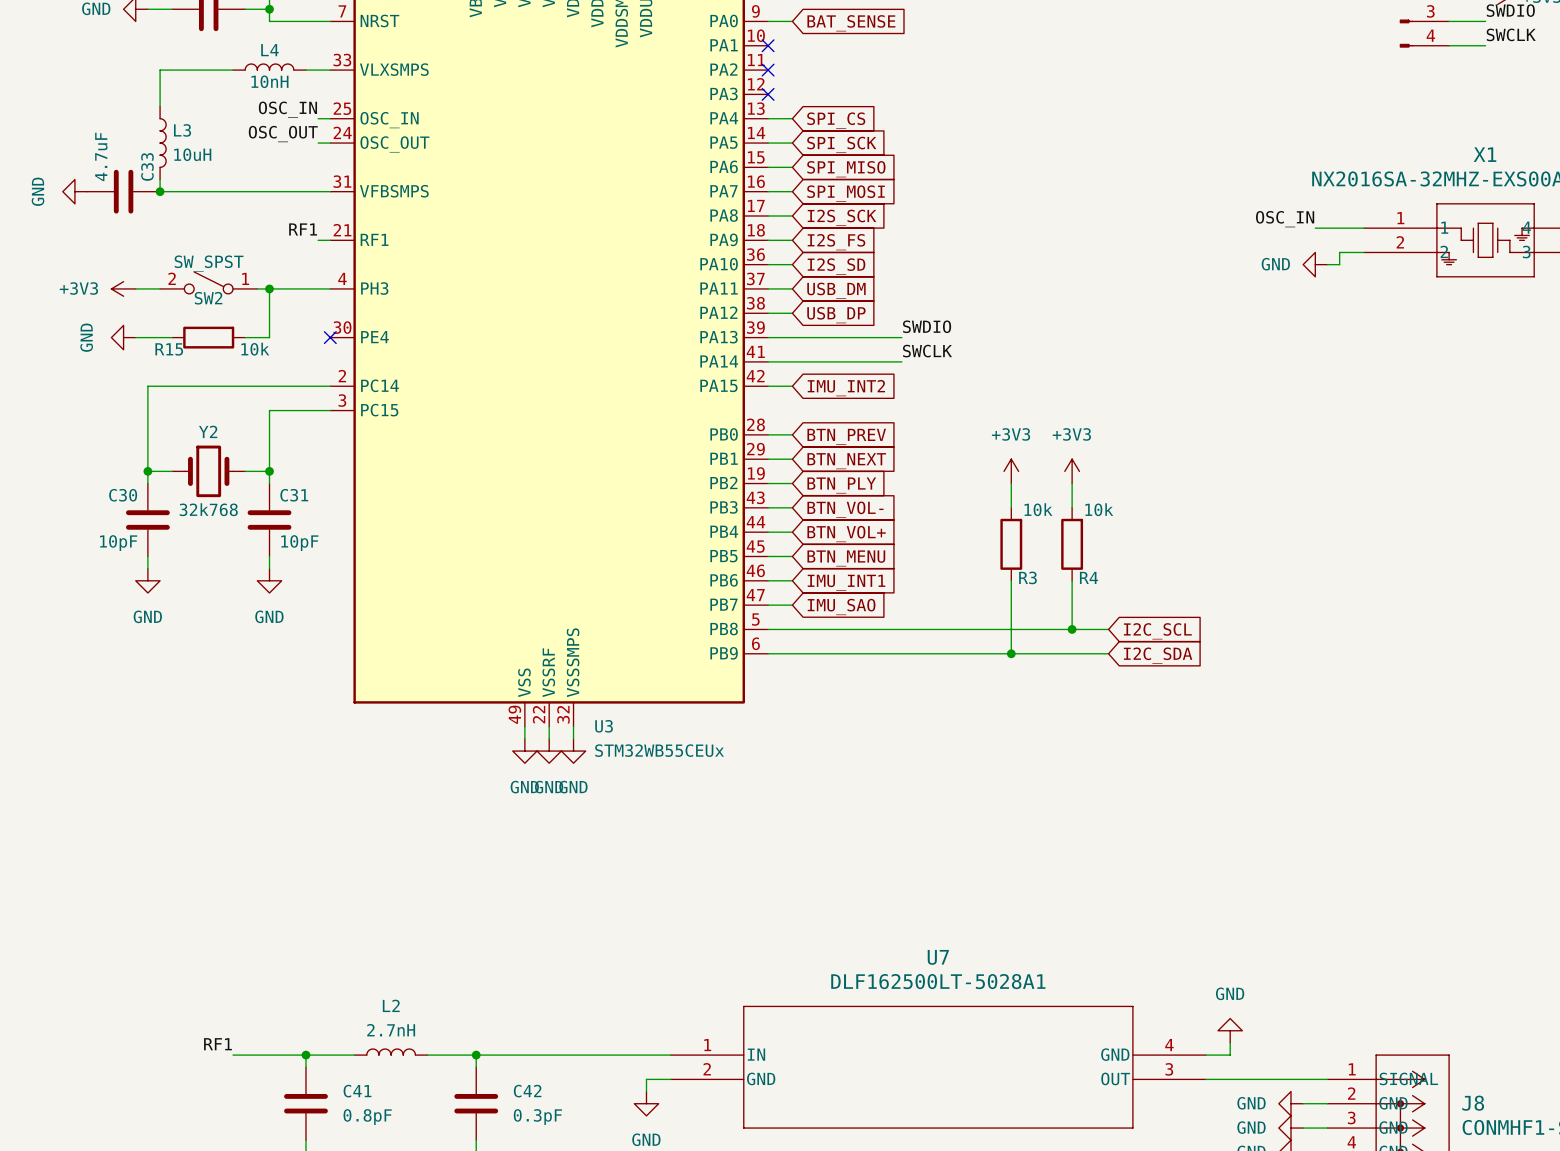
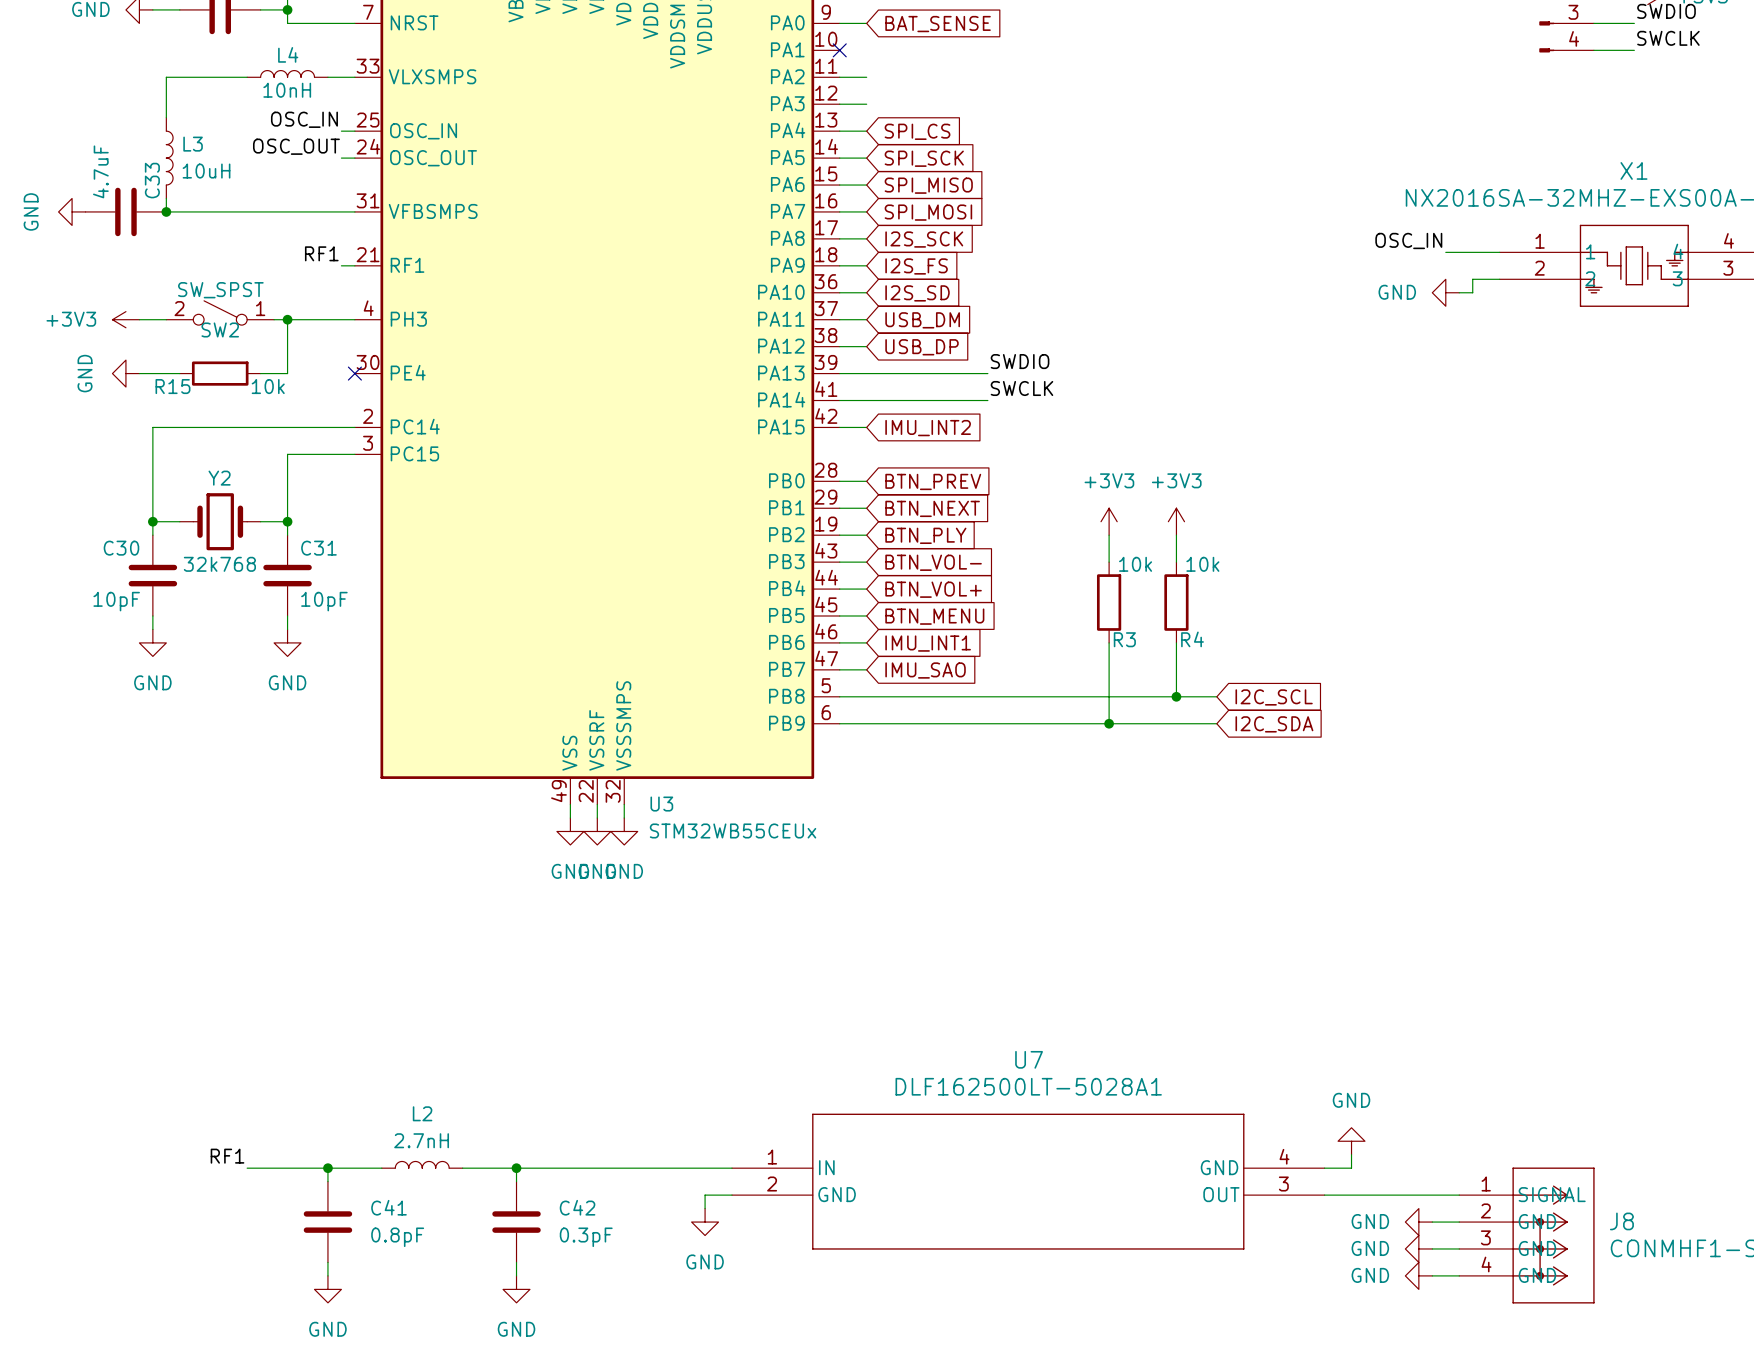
wire: none -> (839, 77) (866, 77)
no-connect mark: (768, 70) -> none
wire: none -> (839, 104) (866, 104)
no-connect mark: (768, 94) -> none

